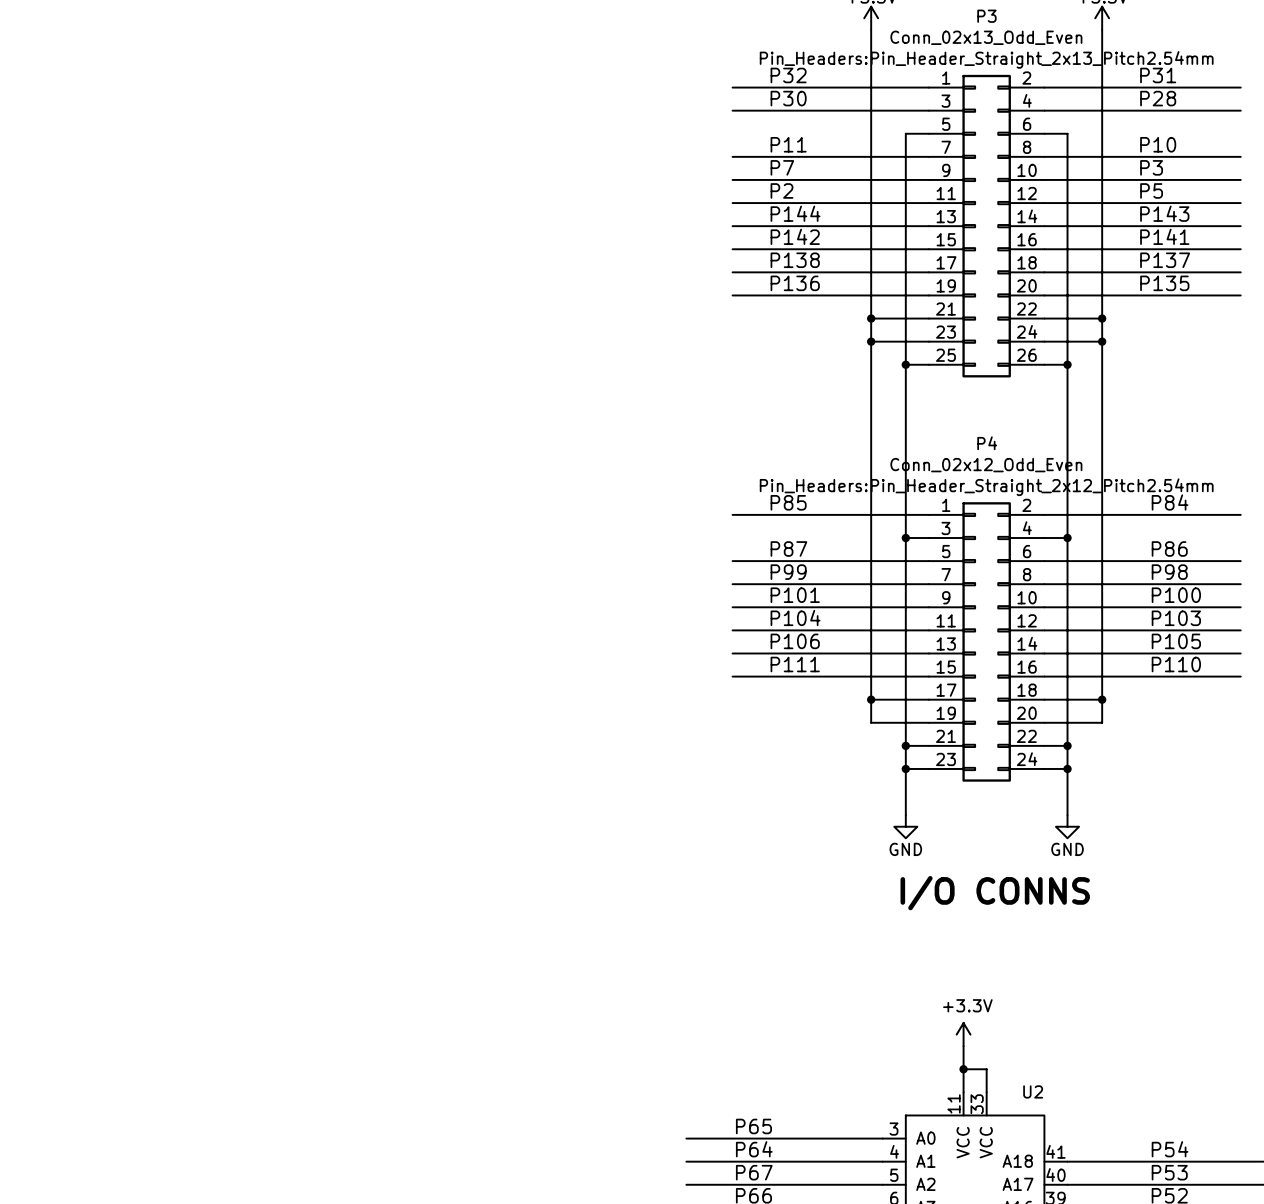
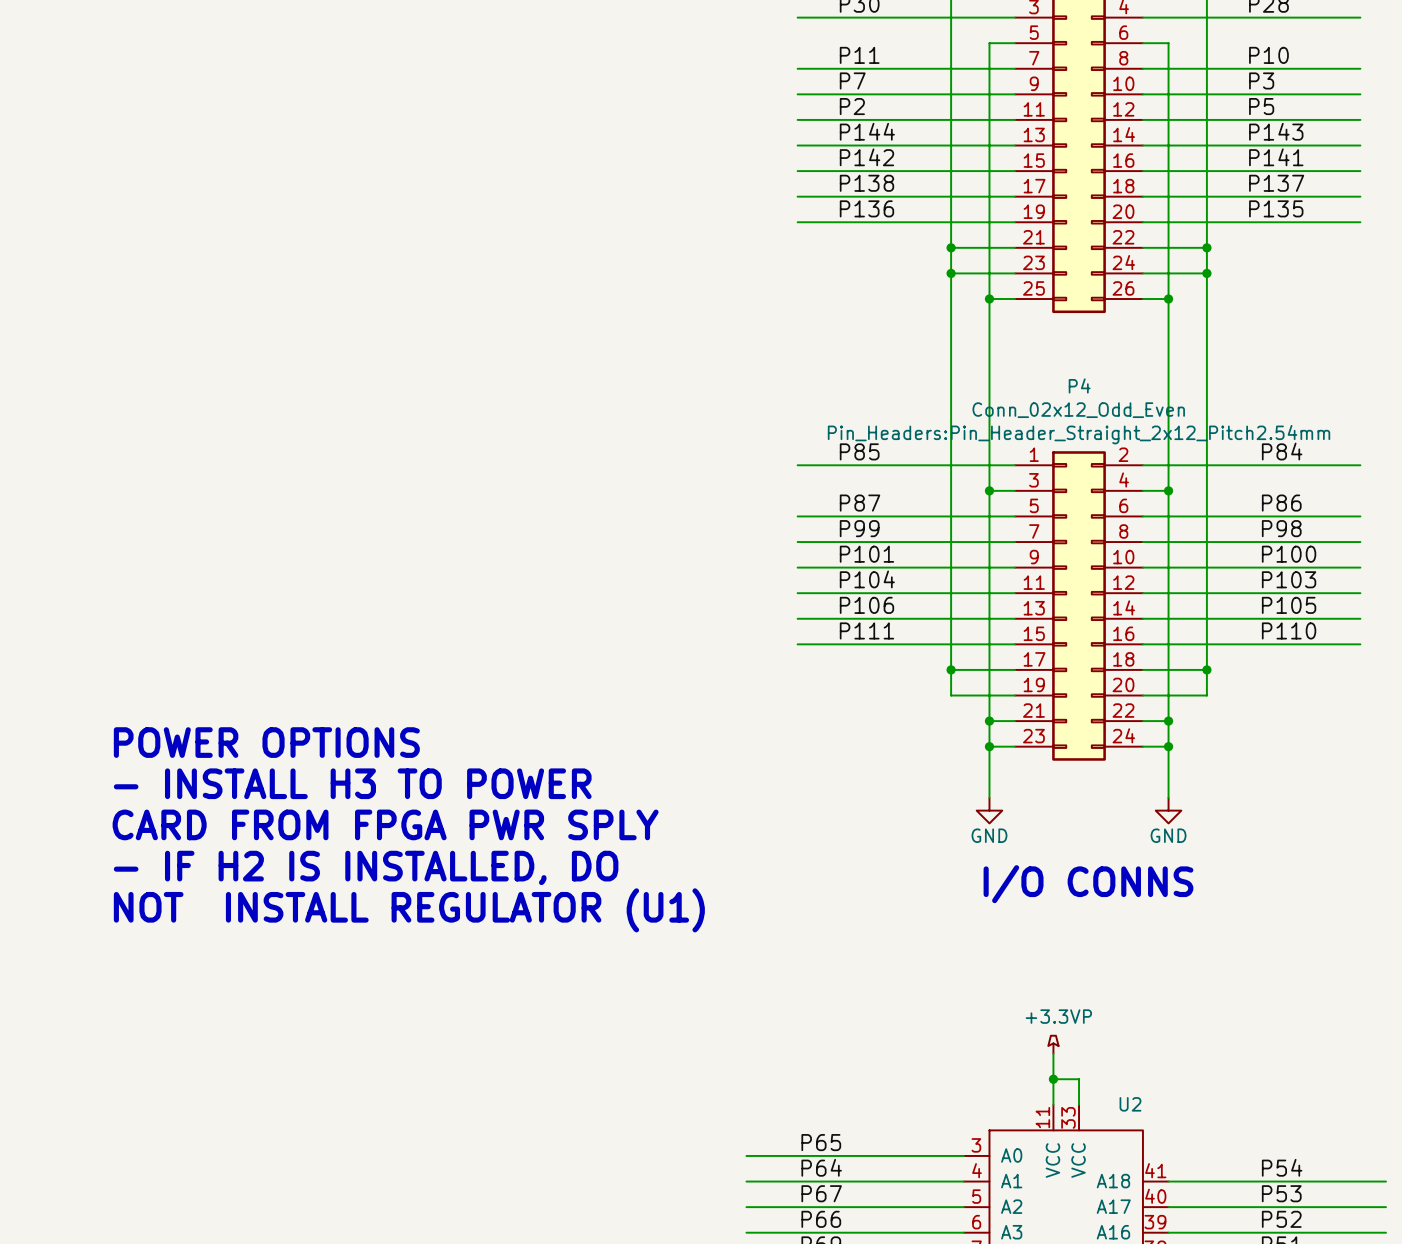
text: none -> POWER OPTIONS (266, 742)
text: none -> - INSTALL H3 TO POWER (352, 783)
text: none -> CARD FROM FPGA PWR SPLY (385, 824)
text: none -> - IF H2 IS INSTALLED, DO (366, 867)
text: none -> NOT INSTALL REGULATOR (U1) (409, 910)
power symbol: +3.3V (963, 1034) -> +3.3VP (1053, 1044)

